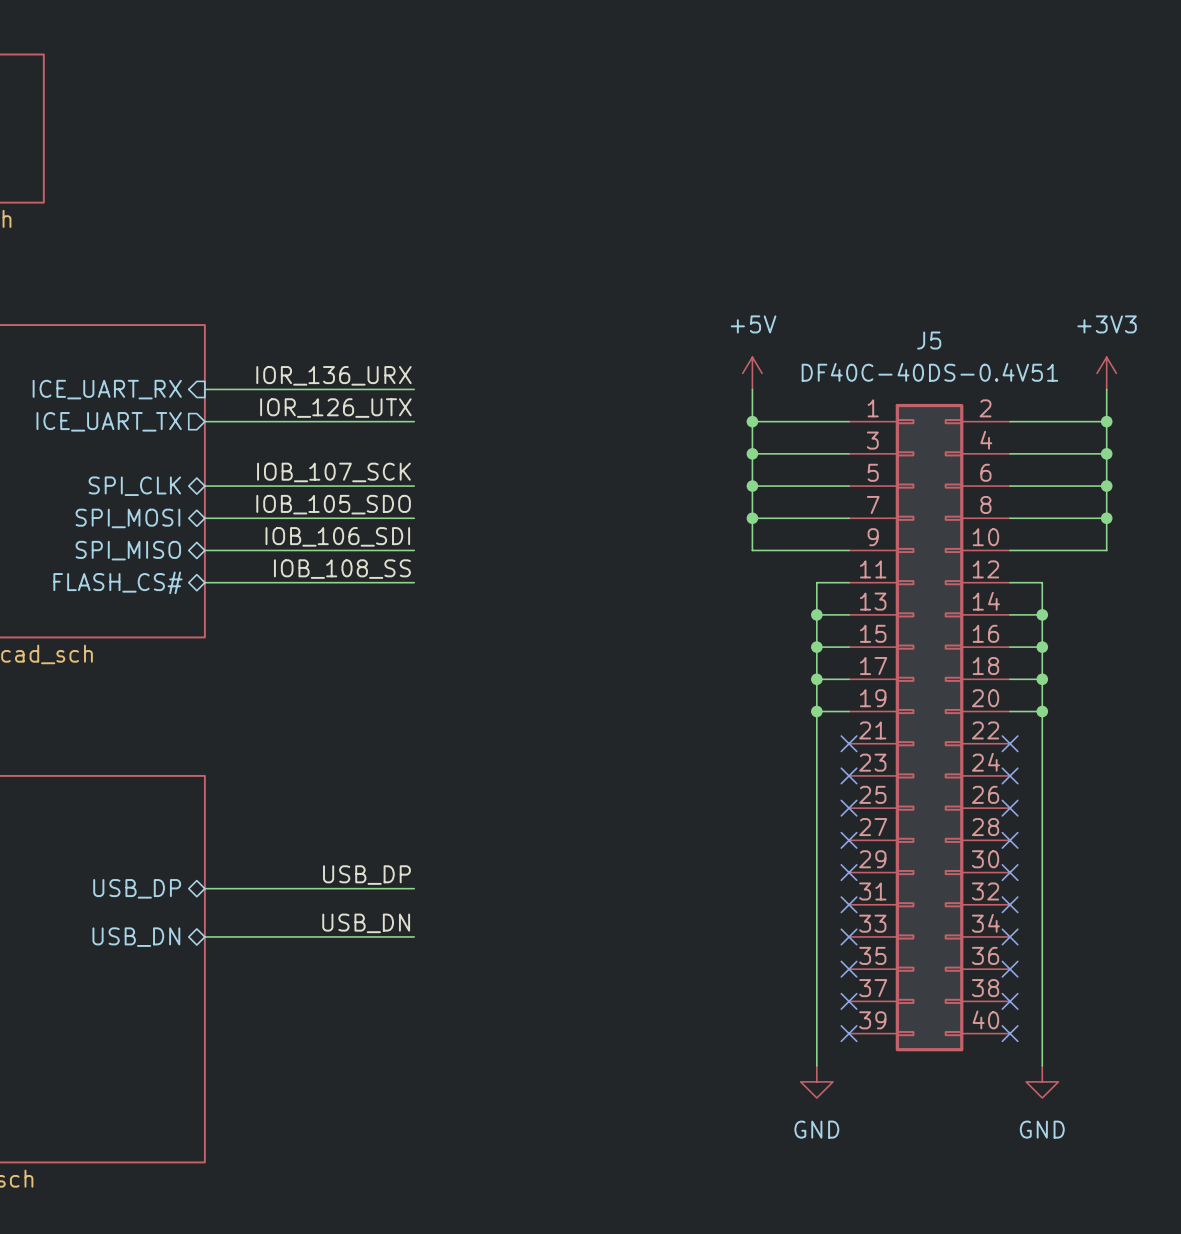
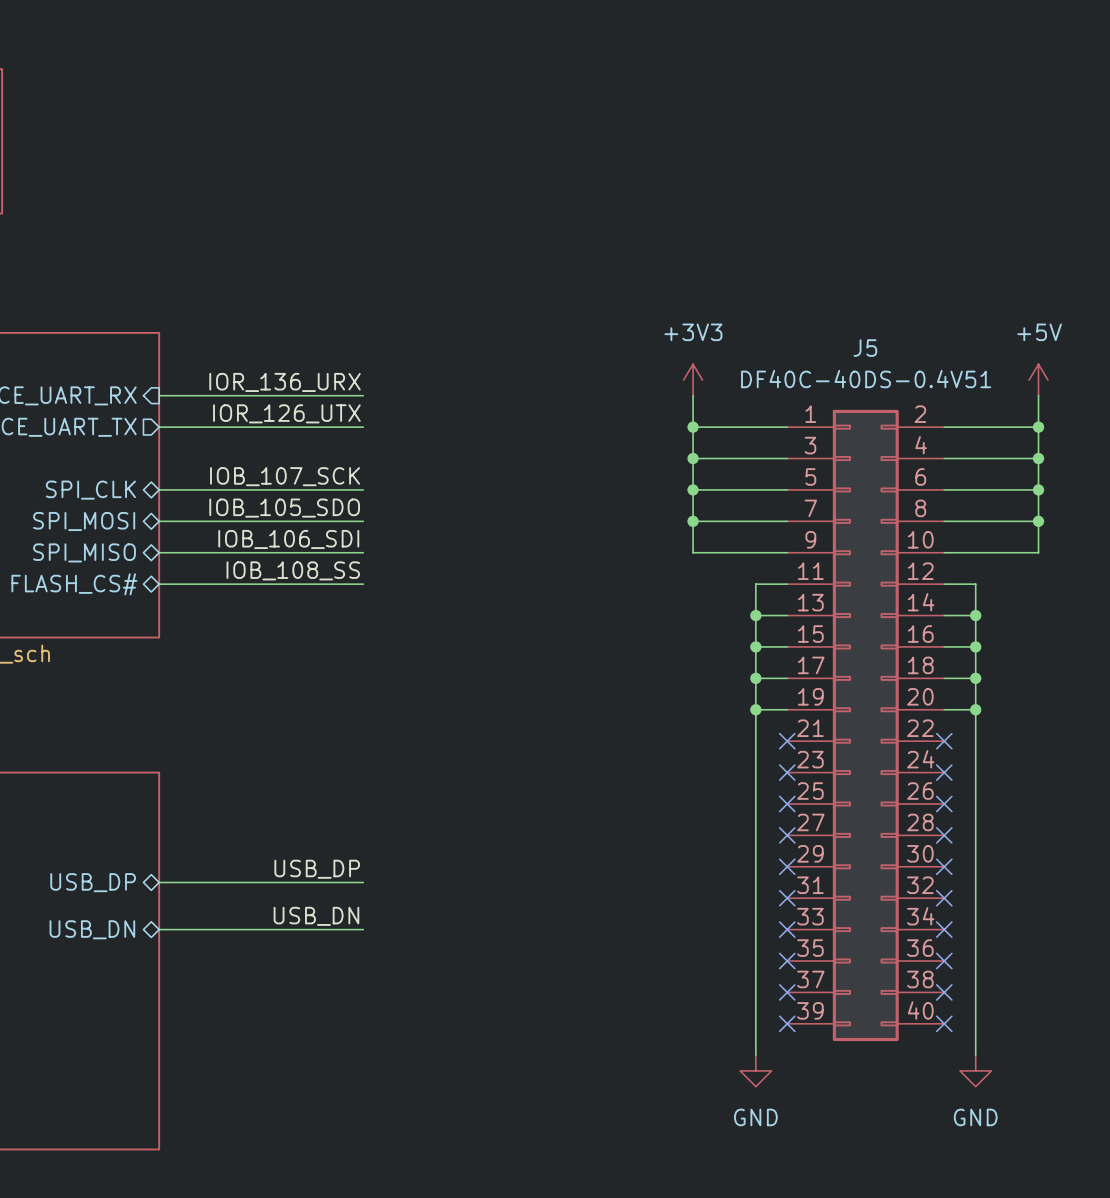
power symbol: +5V (752, 373) -> +3V3 (693, 380)
power symbol: +3V3 (1106, 373) -> +5V (1038, 380)

